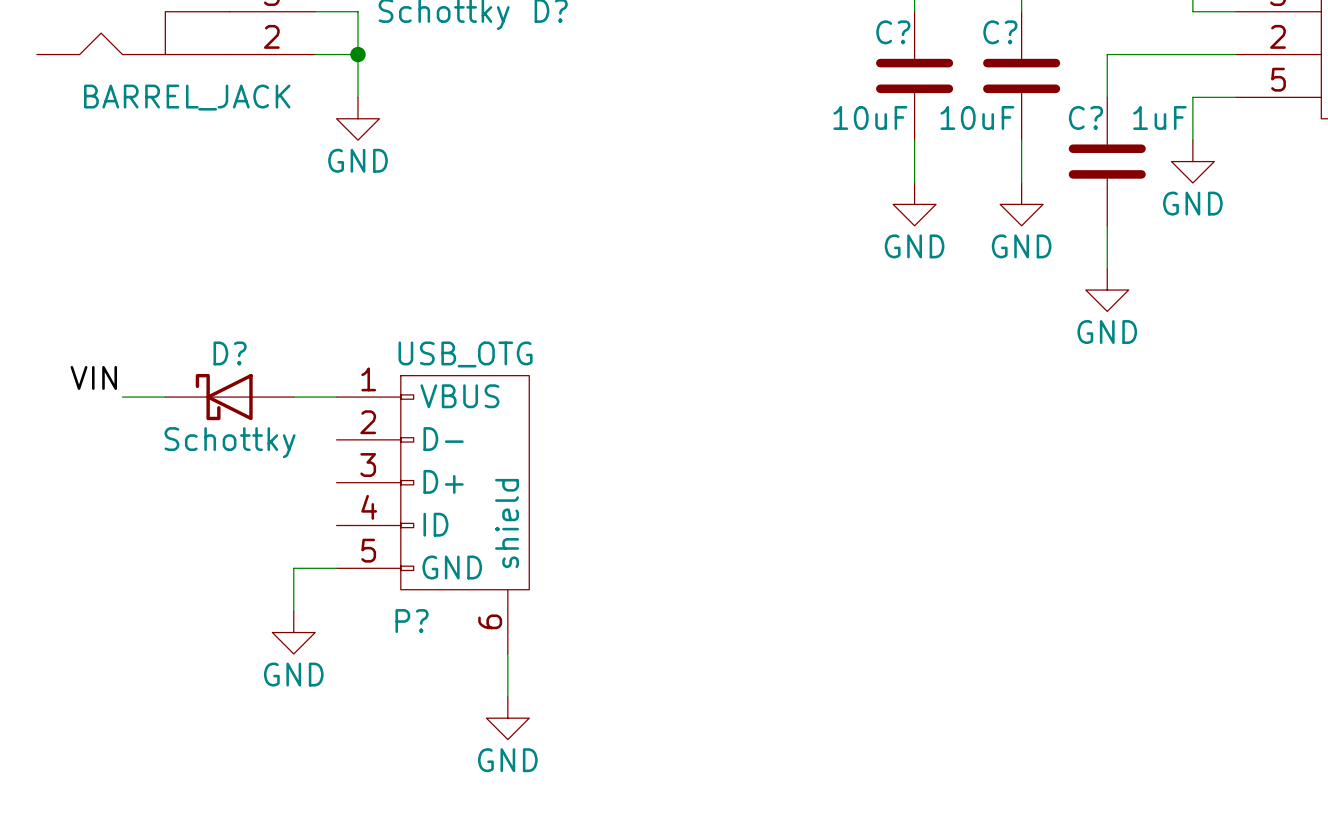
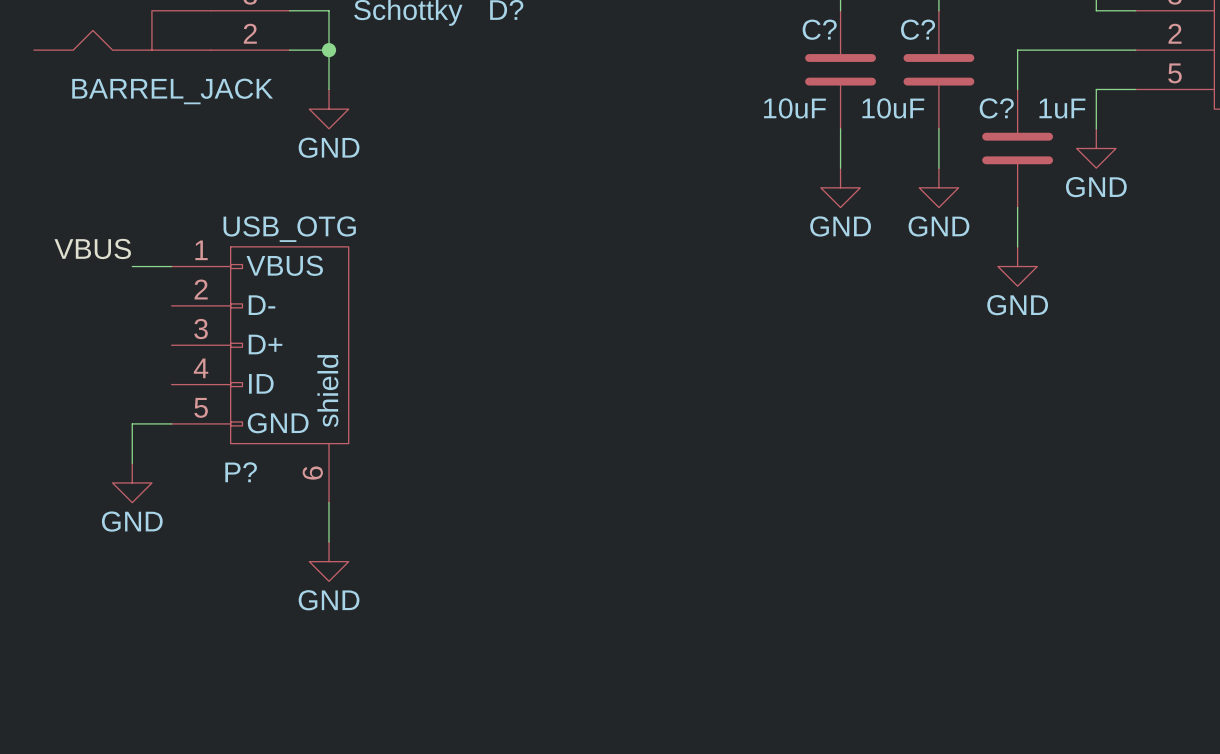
label: none -> VBUS (92, 248)
label: VIN (93, 377) -> none
wire: (122, 397) (165, 397) -> (132, 266) (171, 266)
D?: Schottky (229, 397) -> none
wire: (293, 397) (336, 397) -> none
P? position: (432, 514) -> (260, 374)
power symbol: none -> GND (132, 482)
wire: (336, 568) (293, 568) (293, 611) -> (171, 423) (132, 423) (132, 463)
power symbol position: GND (293, 632) -> GND (329, 561)
wire: (507, 653) (507, 696) -> (329, 502) (329, 541)
power symbol: GND (507, 718) -> none

